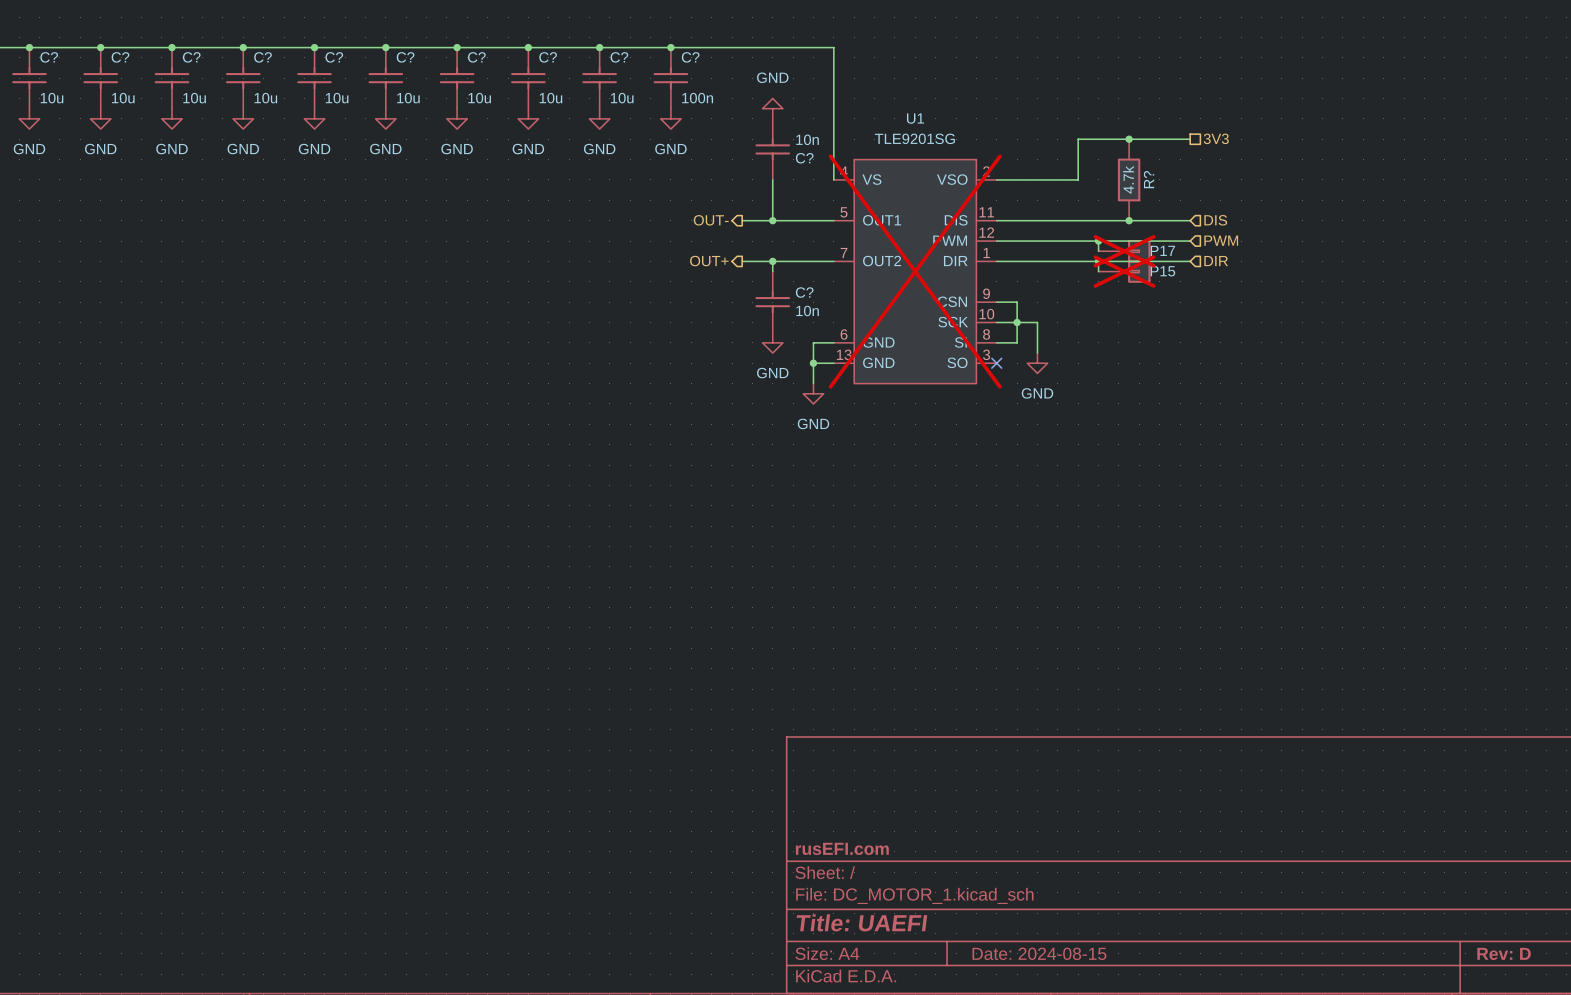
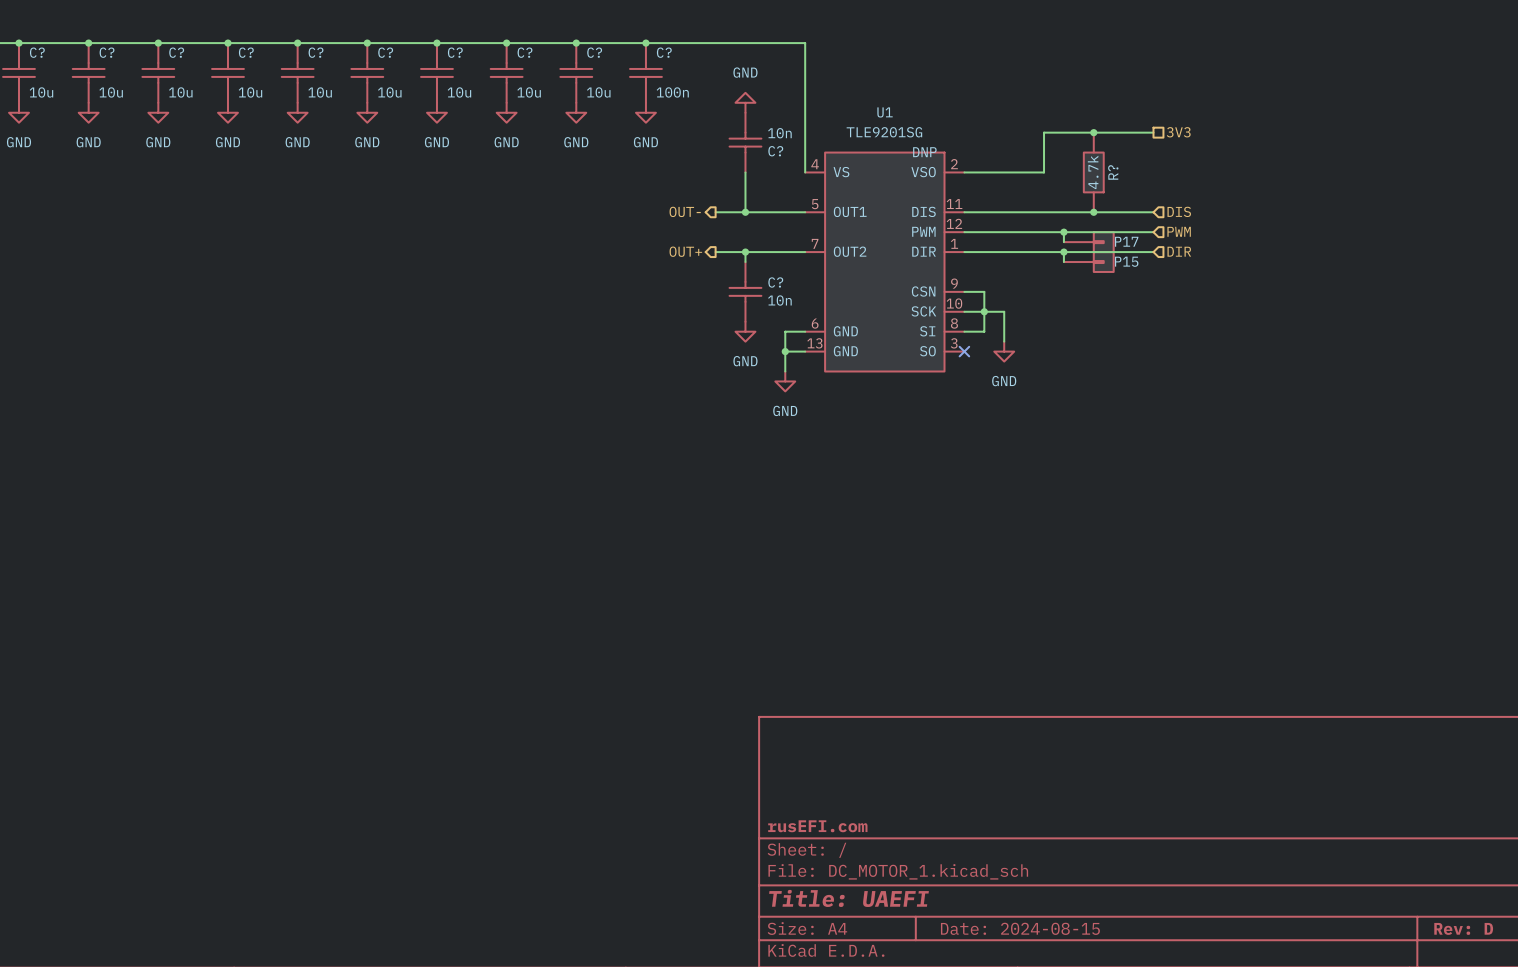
U1 text: none -> DNP (924, 152)
P17 do-not-place cross: (1124, 251) -> none
U1 do-not-place cross: (915, 271) -> none
P15 do-not-place cross: (1124, 271) -> none

